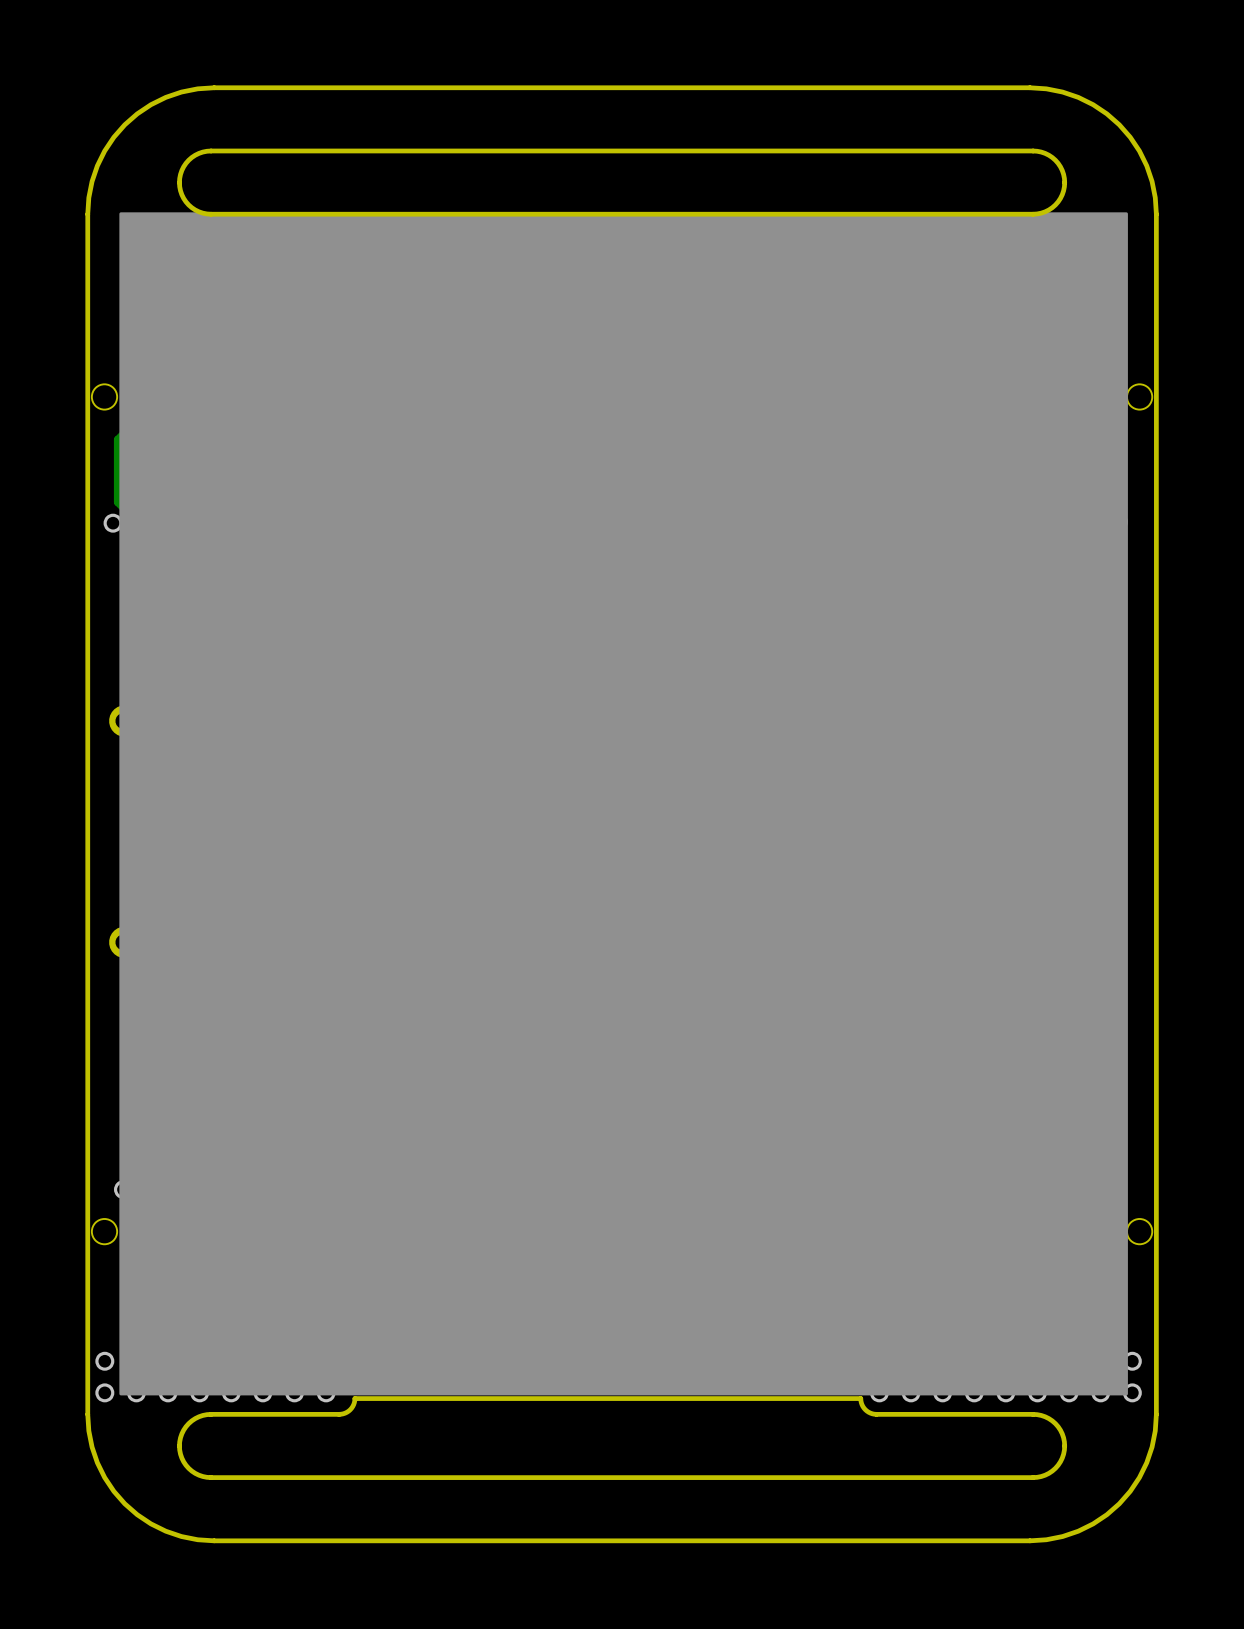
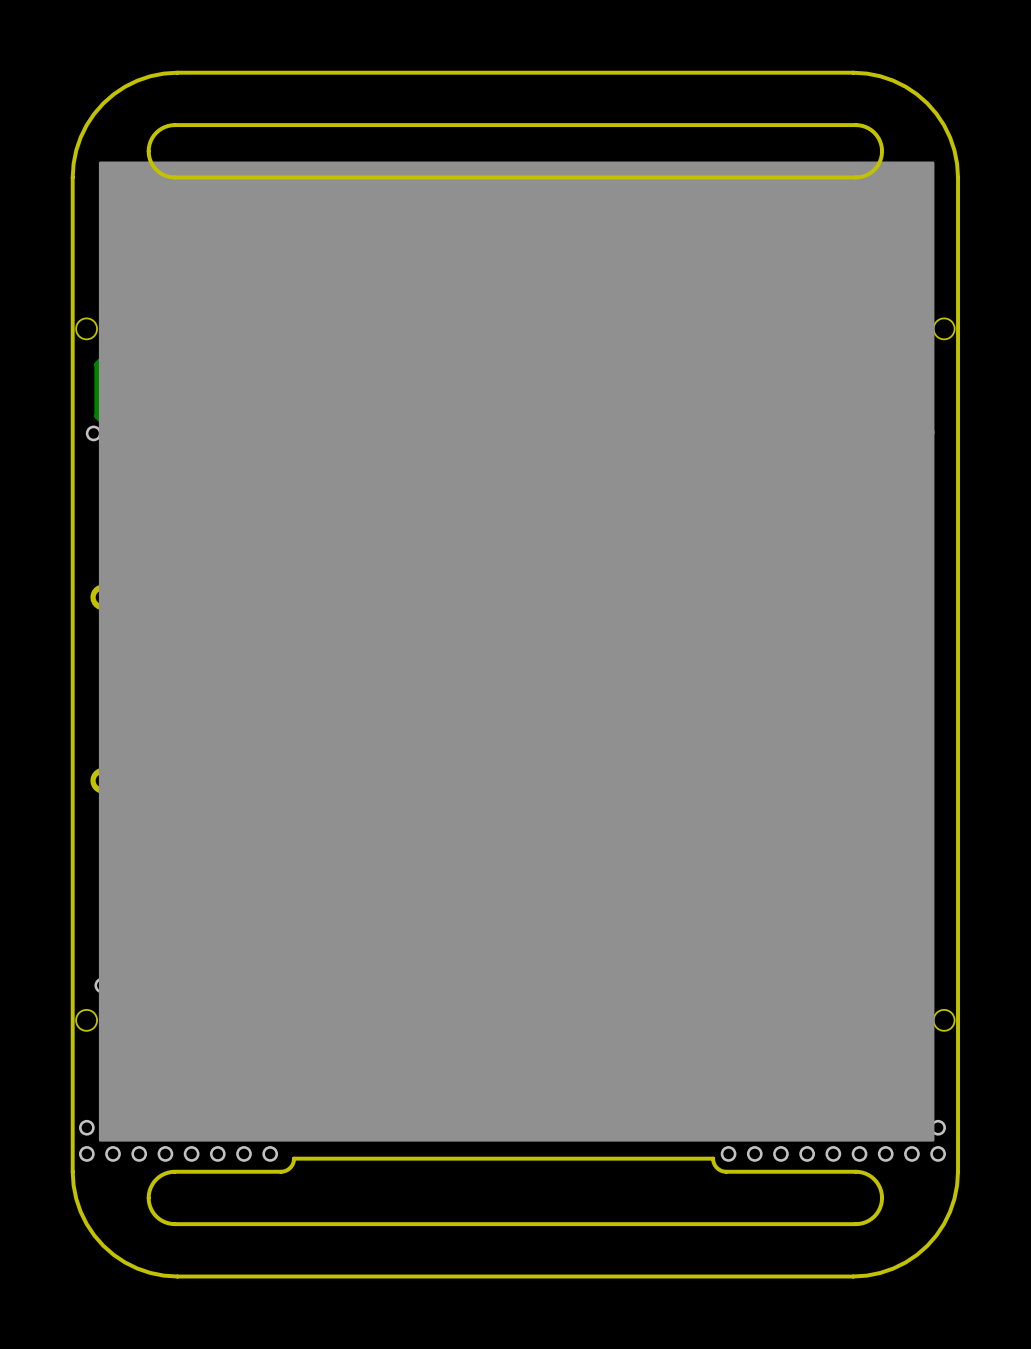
drawing position: (623, 803) -> (516, 651)

